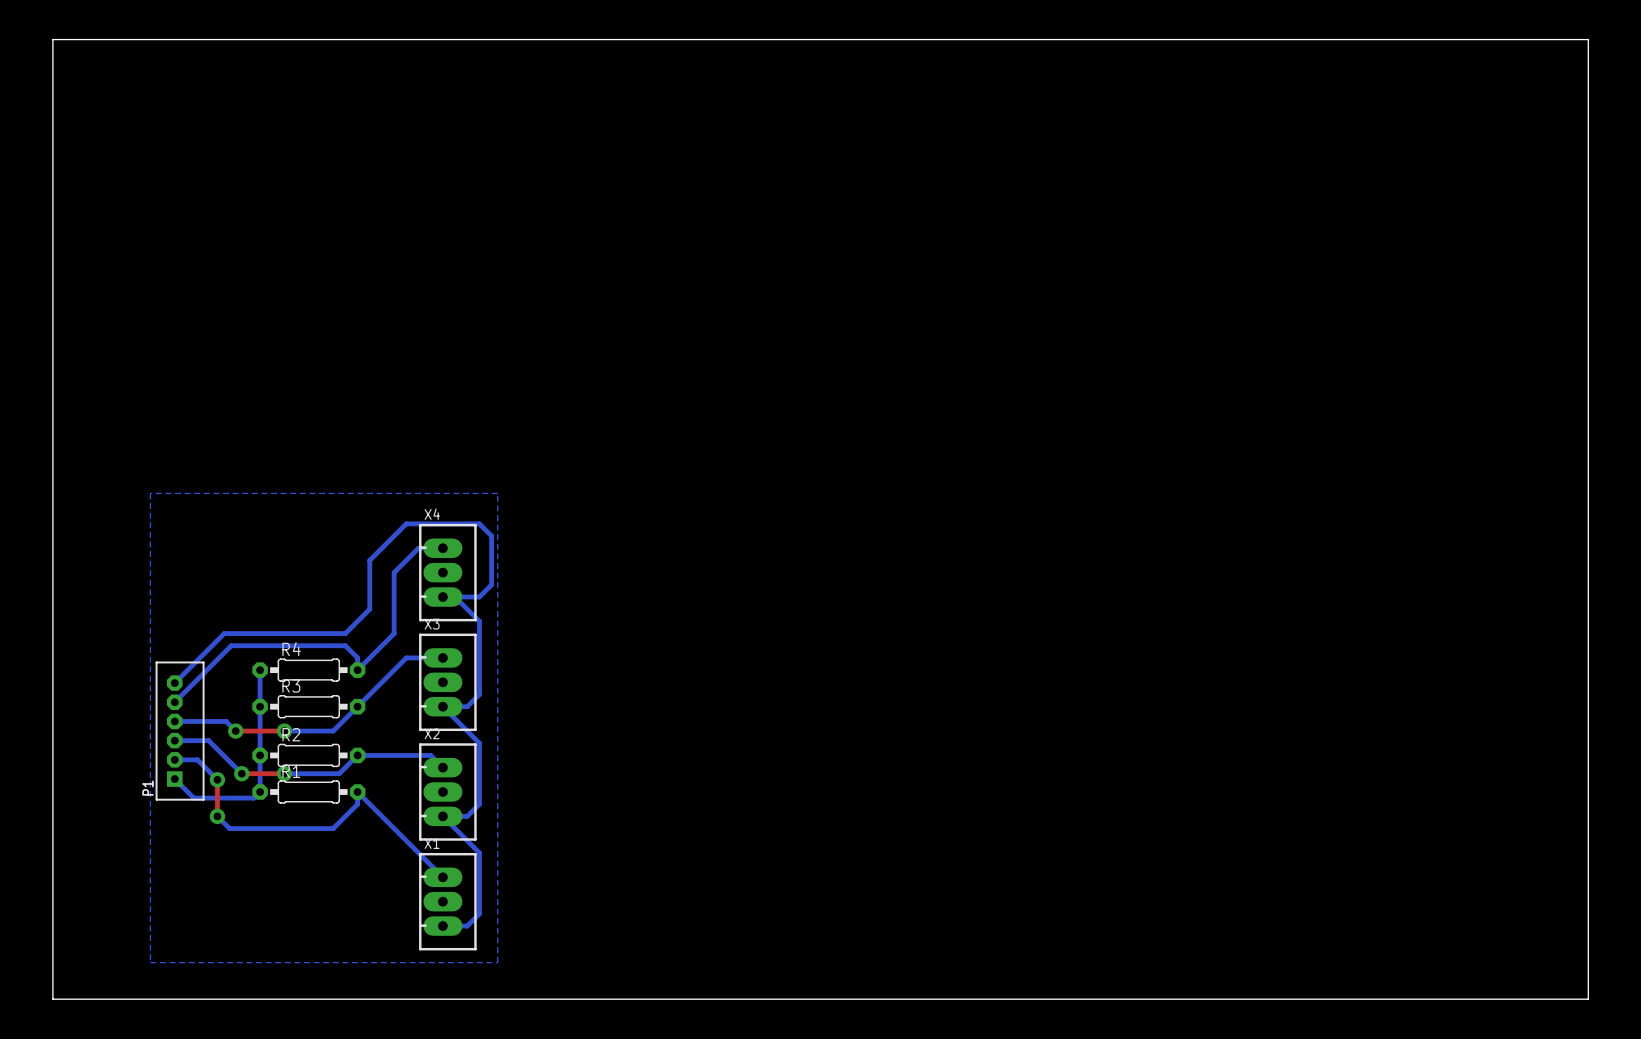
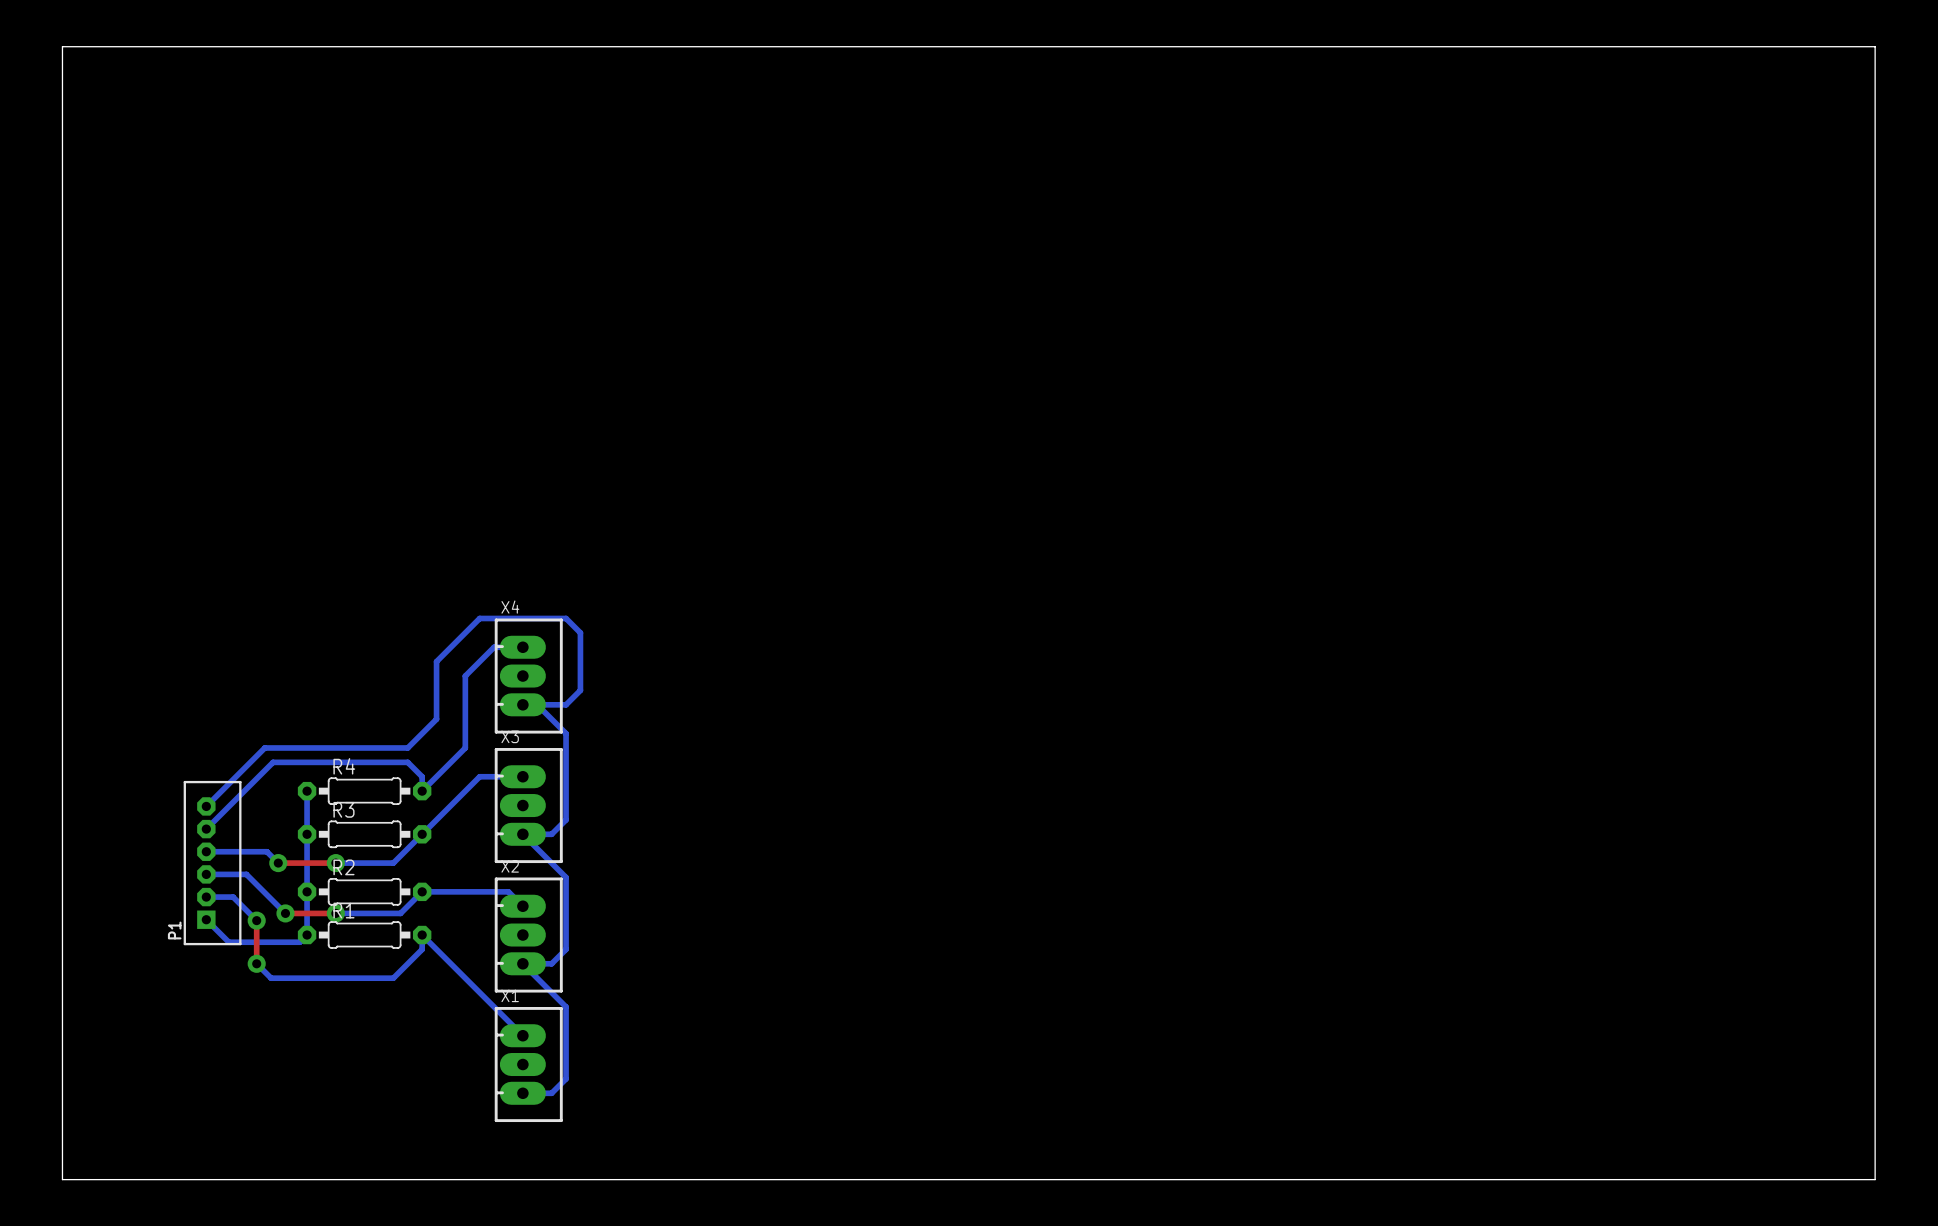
bottom zone outline: (150, 493) (150, 962) (497, 962) (497, 493) (150, 493) -> none

